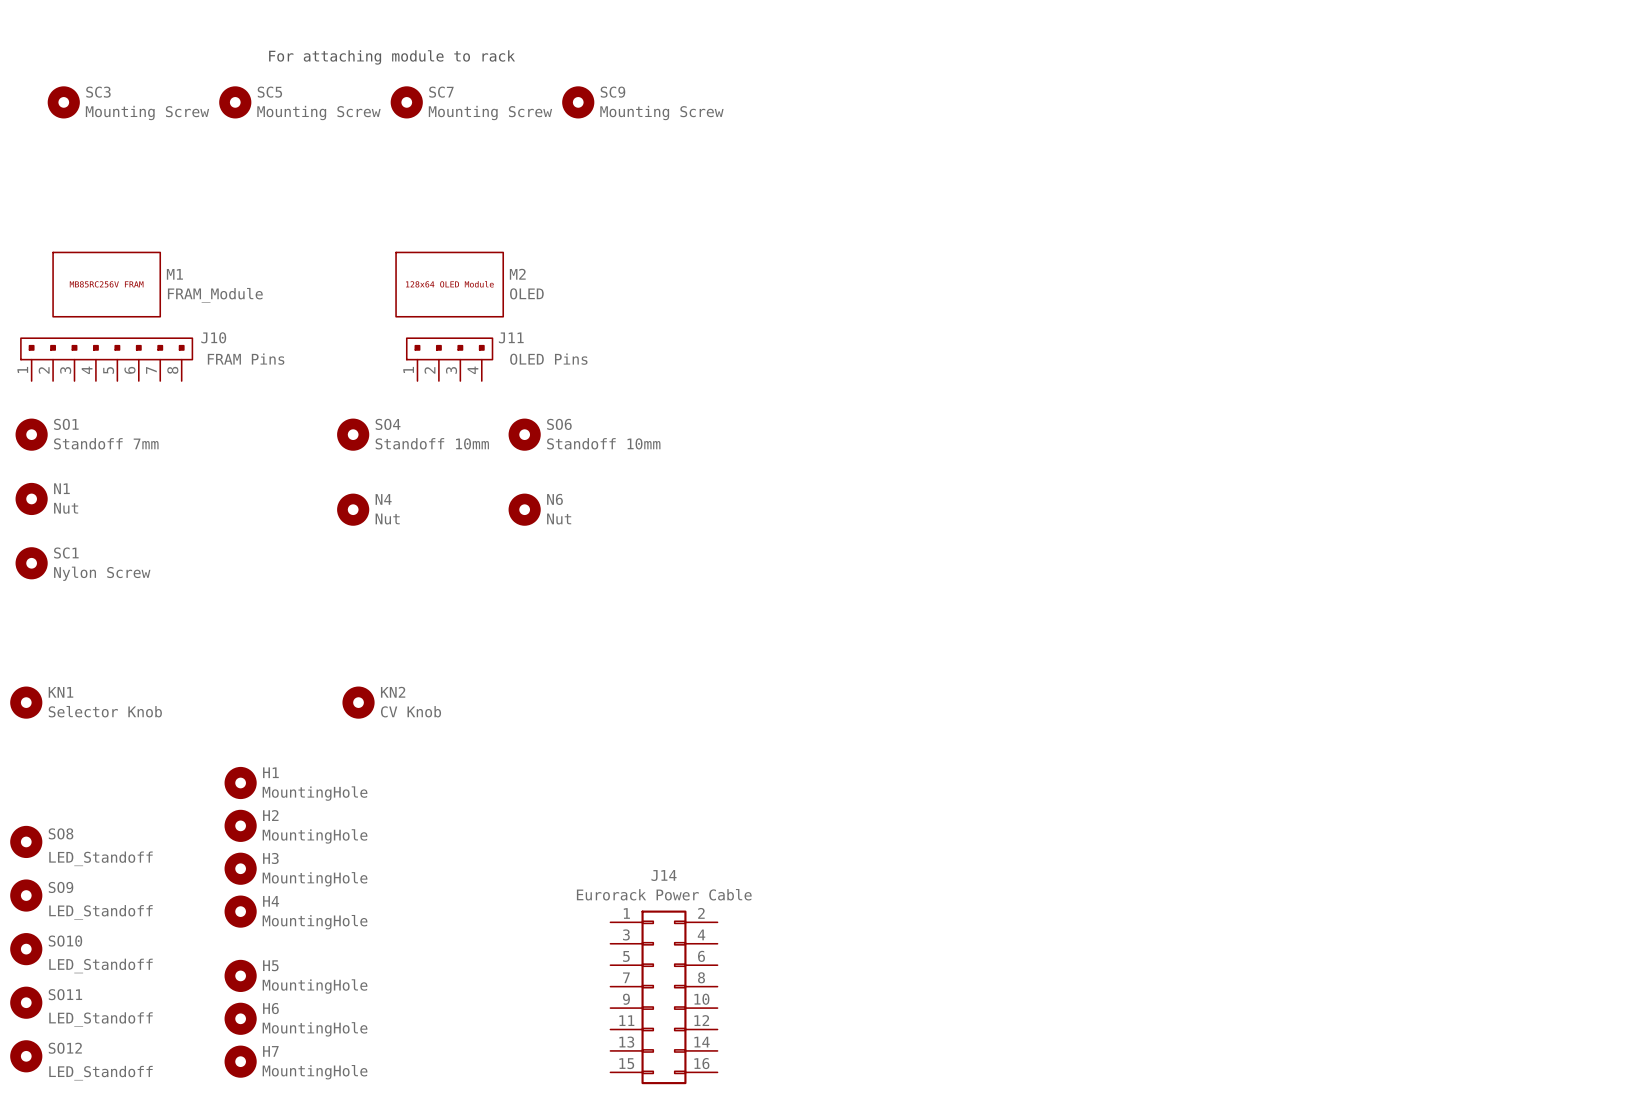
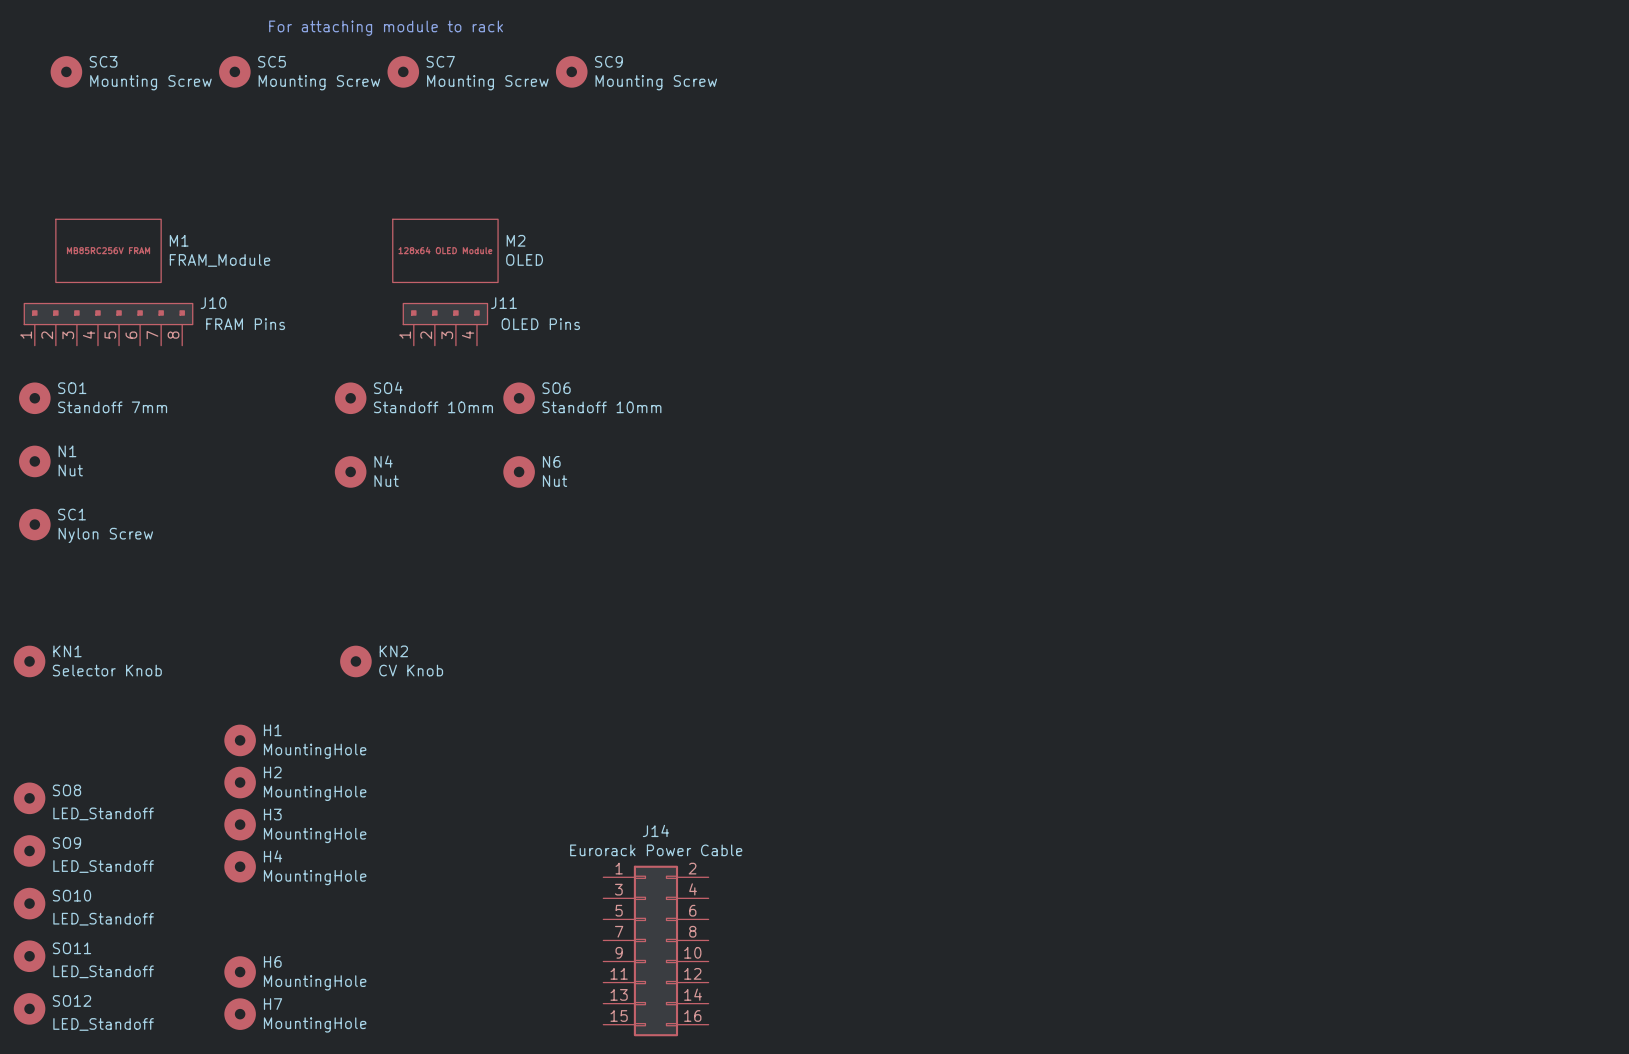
H5: MountingHole (240, 975) -> none

